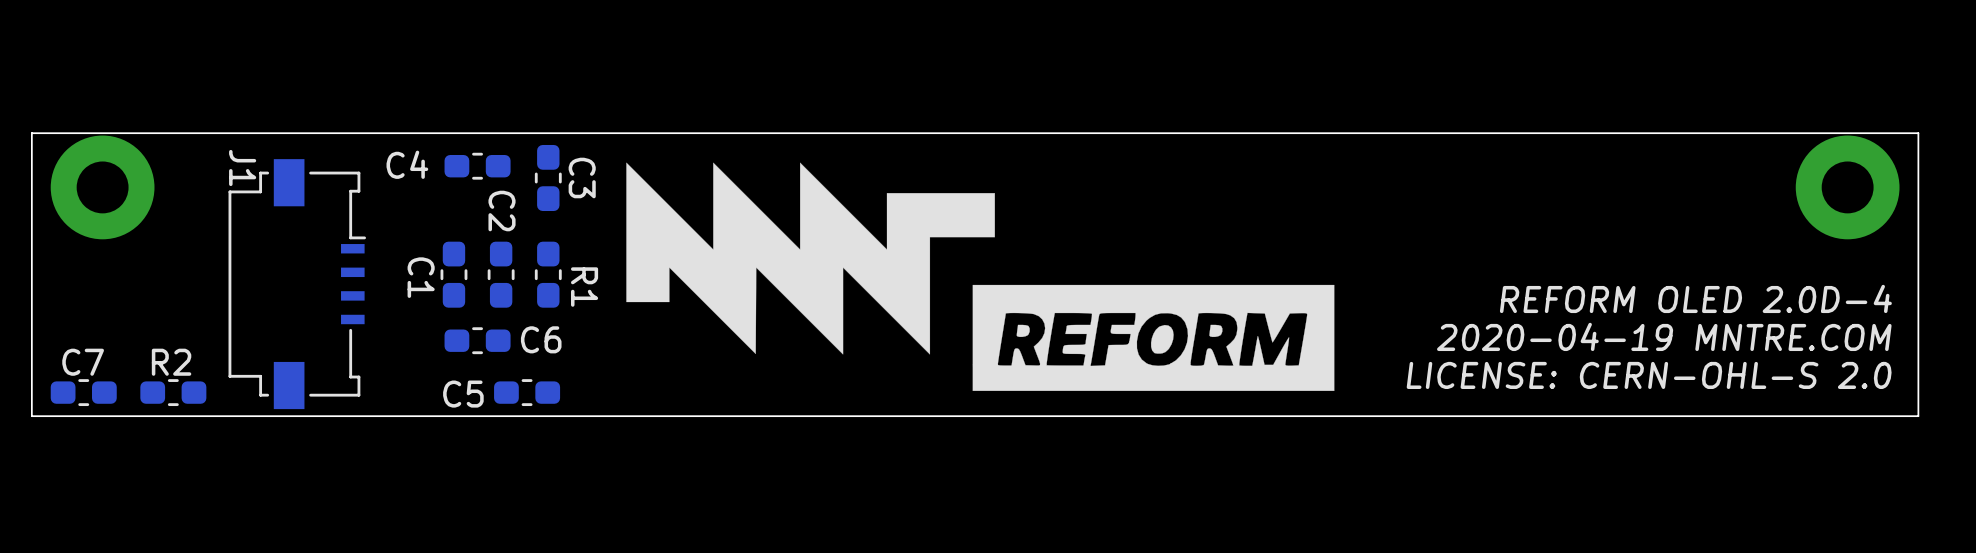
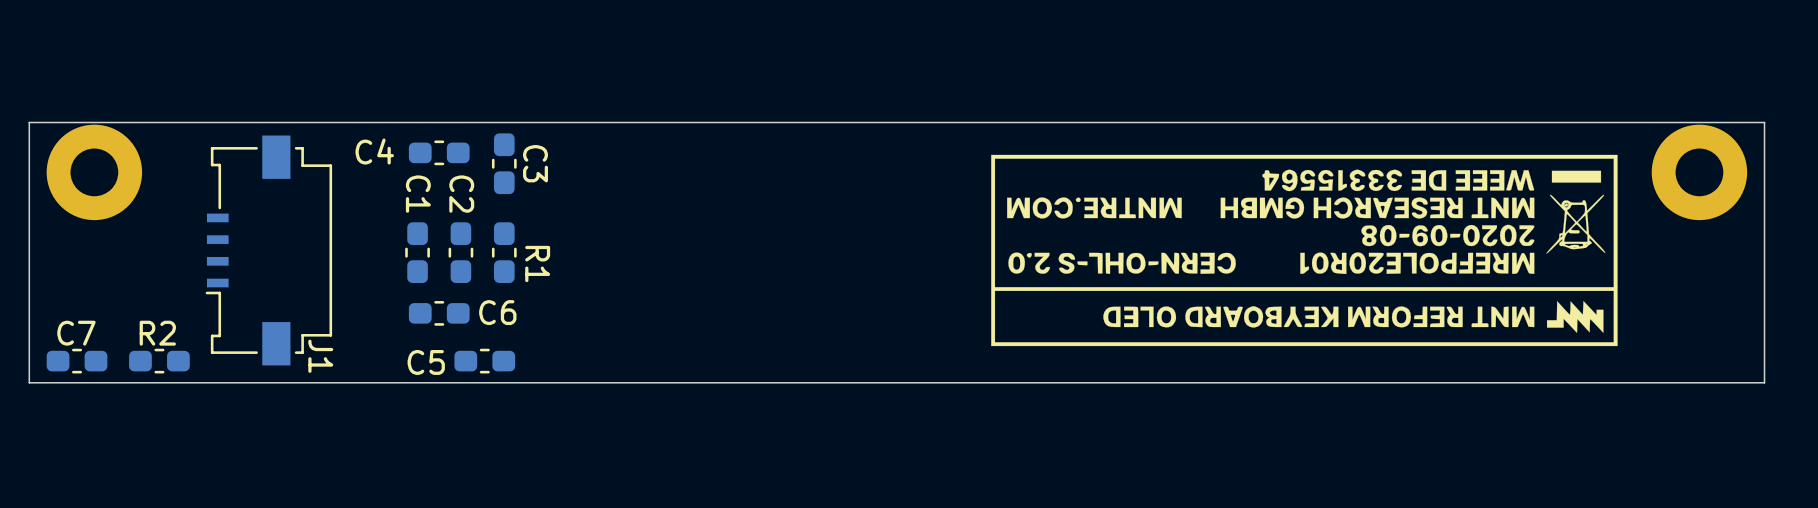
drawing: [626, 162, 1335, 391] -> none
drawing: none -> [991, 154, 1618, 347]
C1 name position: C1 (421, 277) -> C1 (418, 194)
J1 rotation: 0° (297, 284) -> 180° (268, 250)
text: REFORM OLED 2.0D-4 (1695, 298) -> none
text: 2020-04-19 MNTRE.COM (1664, 336) -> none
text: LICENSE: CERN-OHL-S 2.0 (1649, 375) -> none

